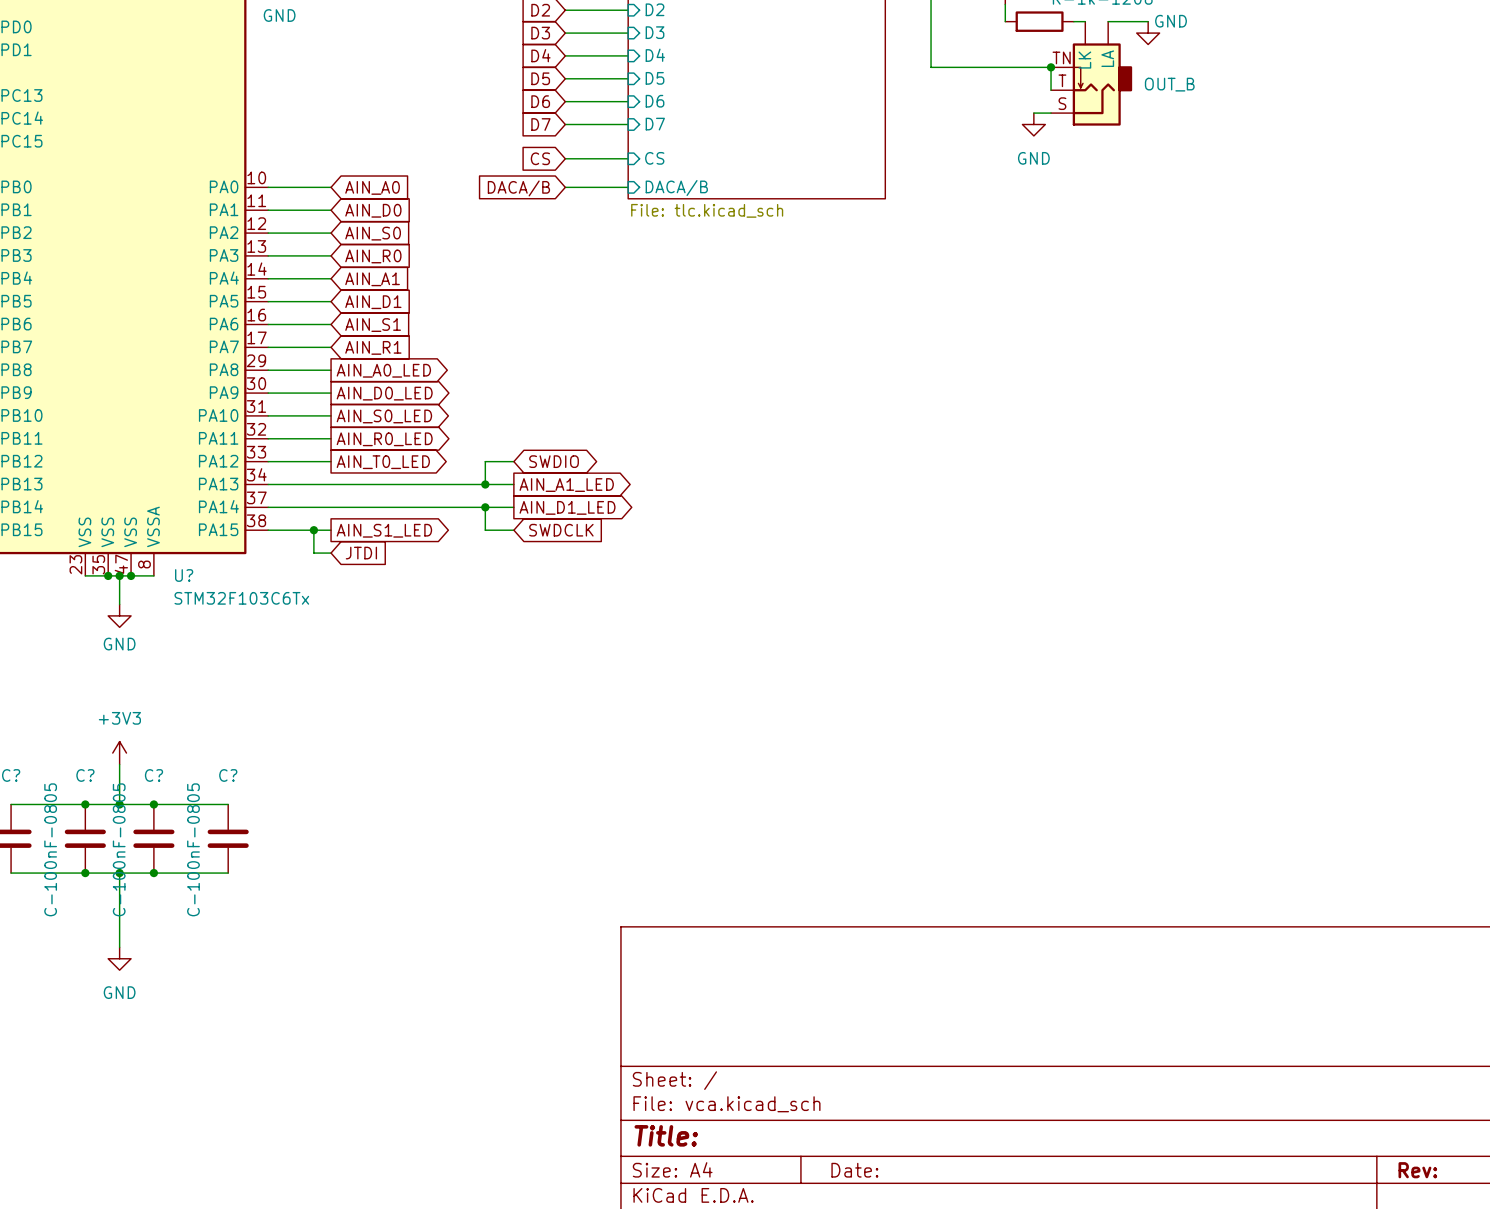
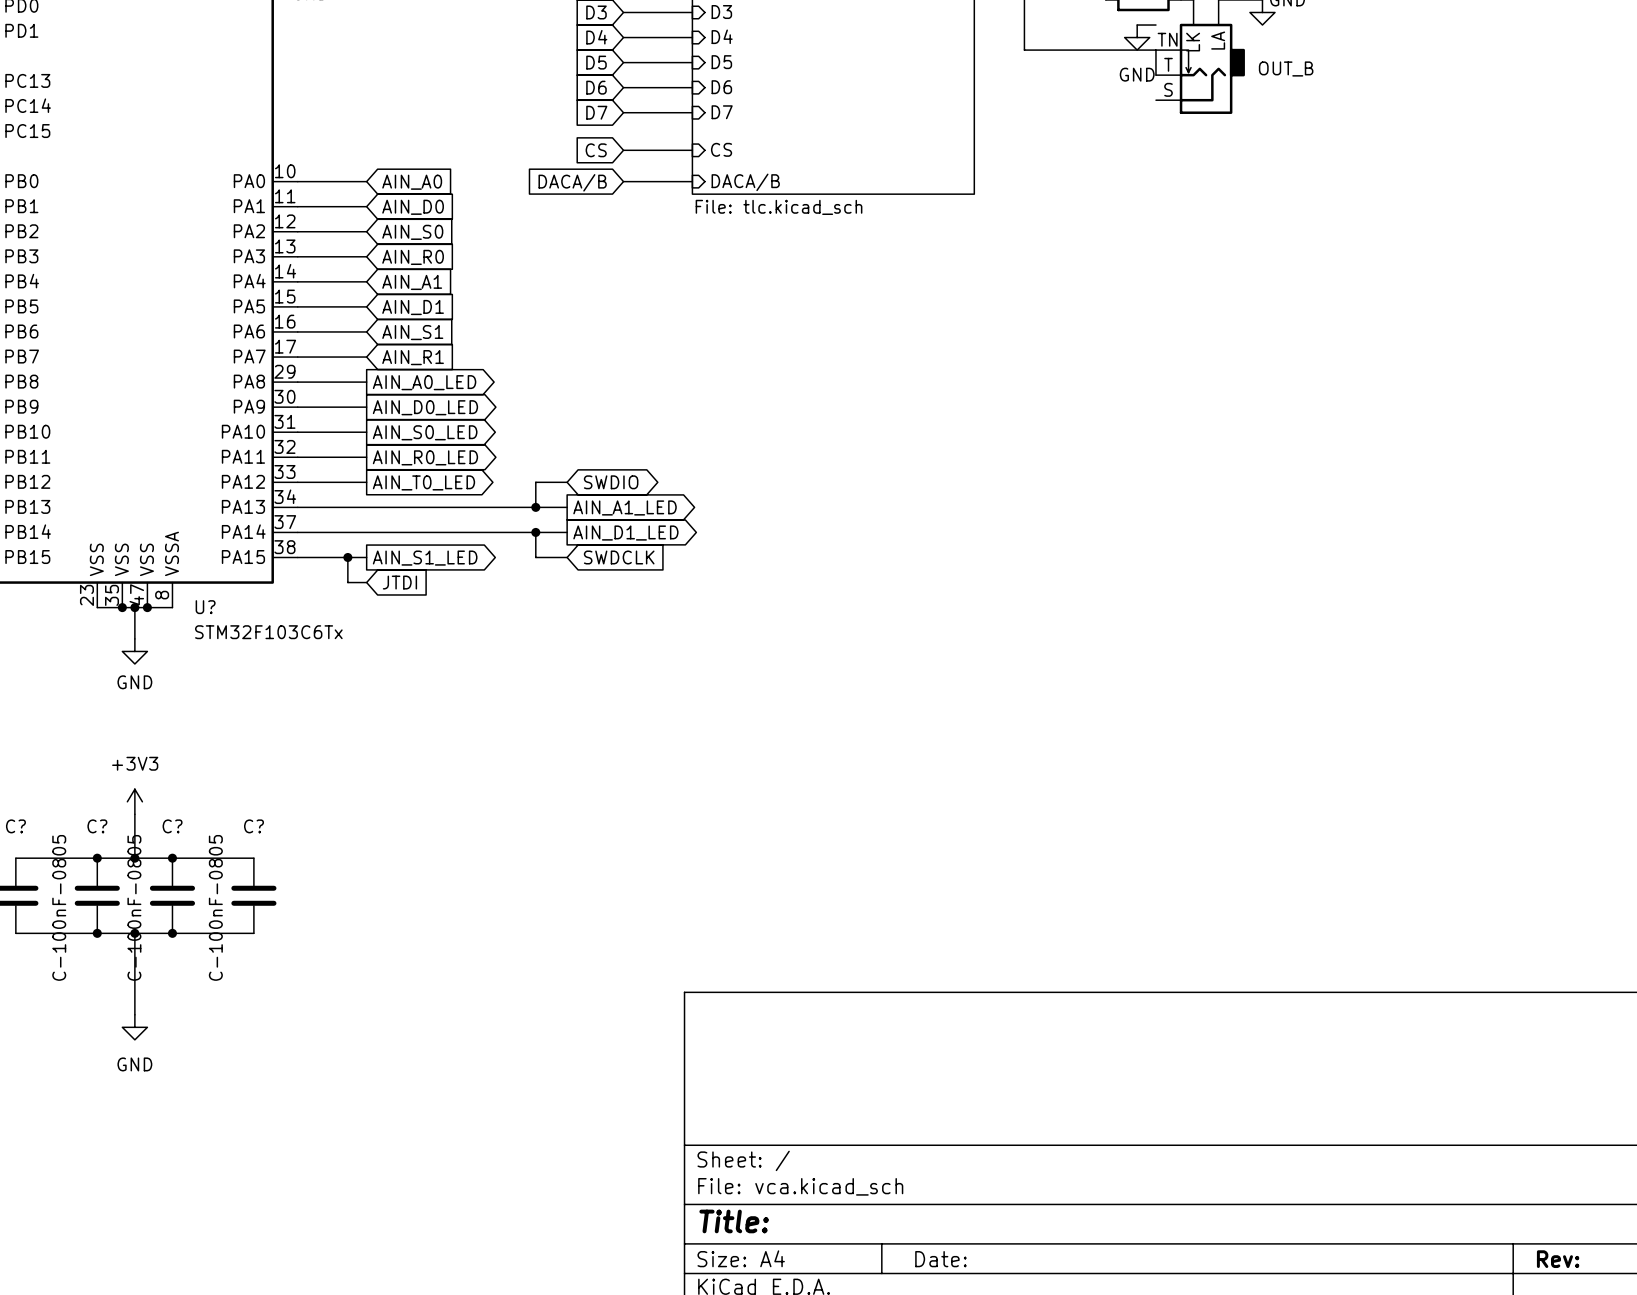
junction: (1051, 67) -> none
wire: (1033, 113) (1051, 113) -> (1137, 25) (1155, 25)
power symbol position: GND (1033, 124) -> GND (1137, 37)

